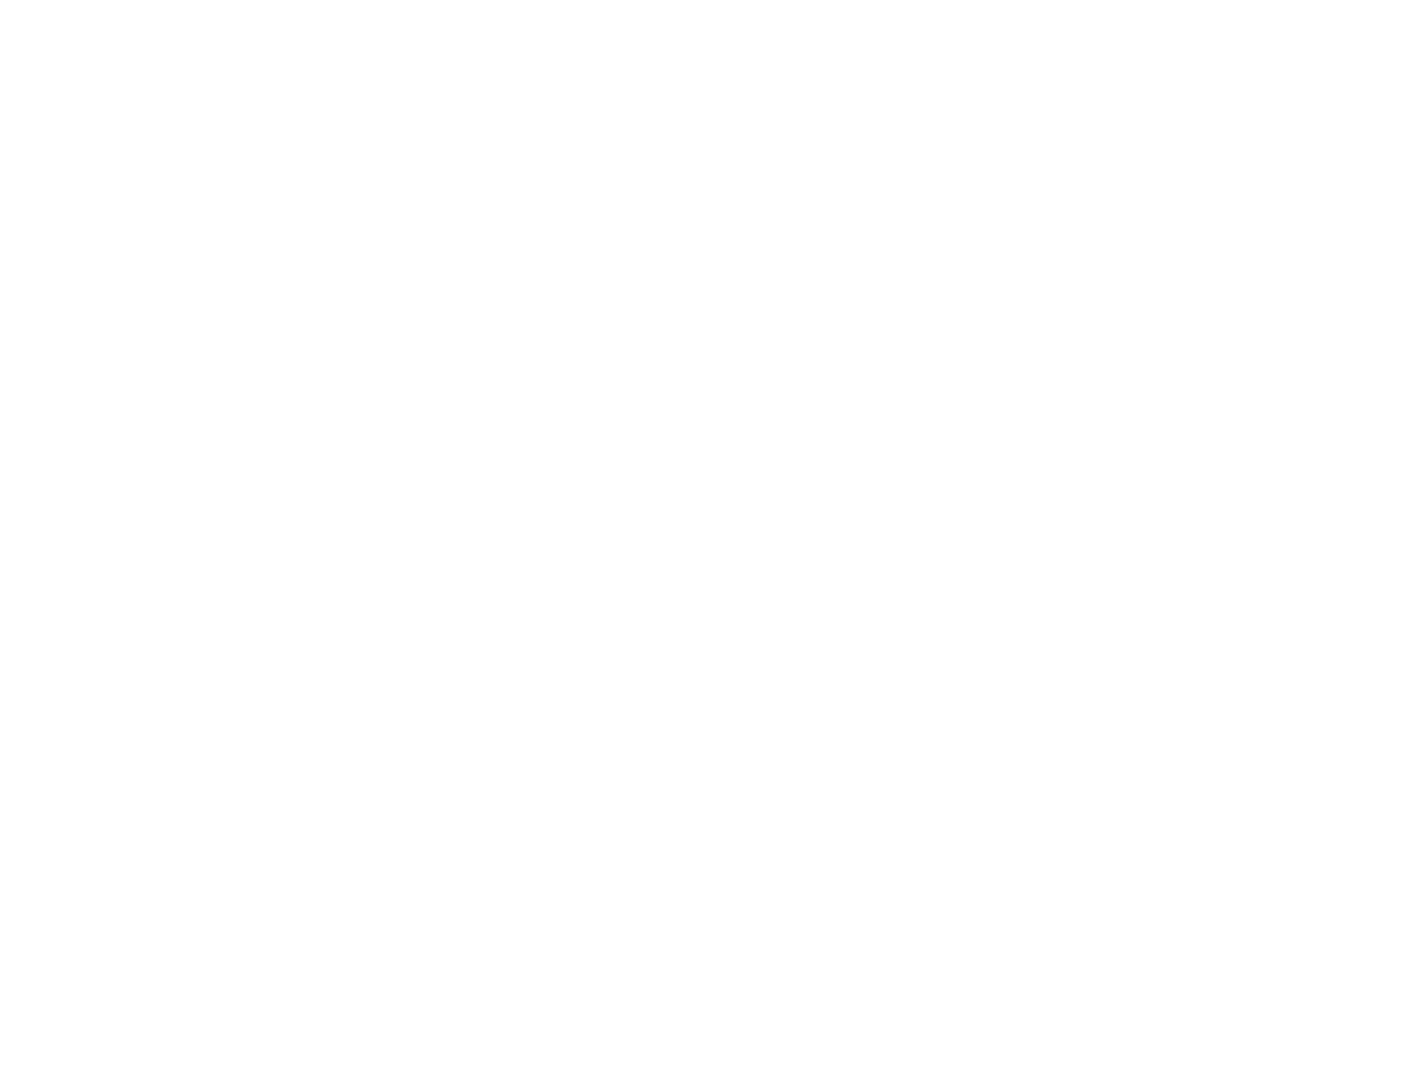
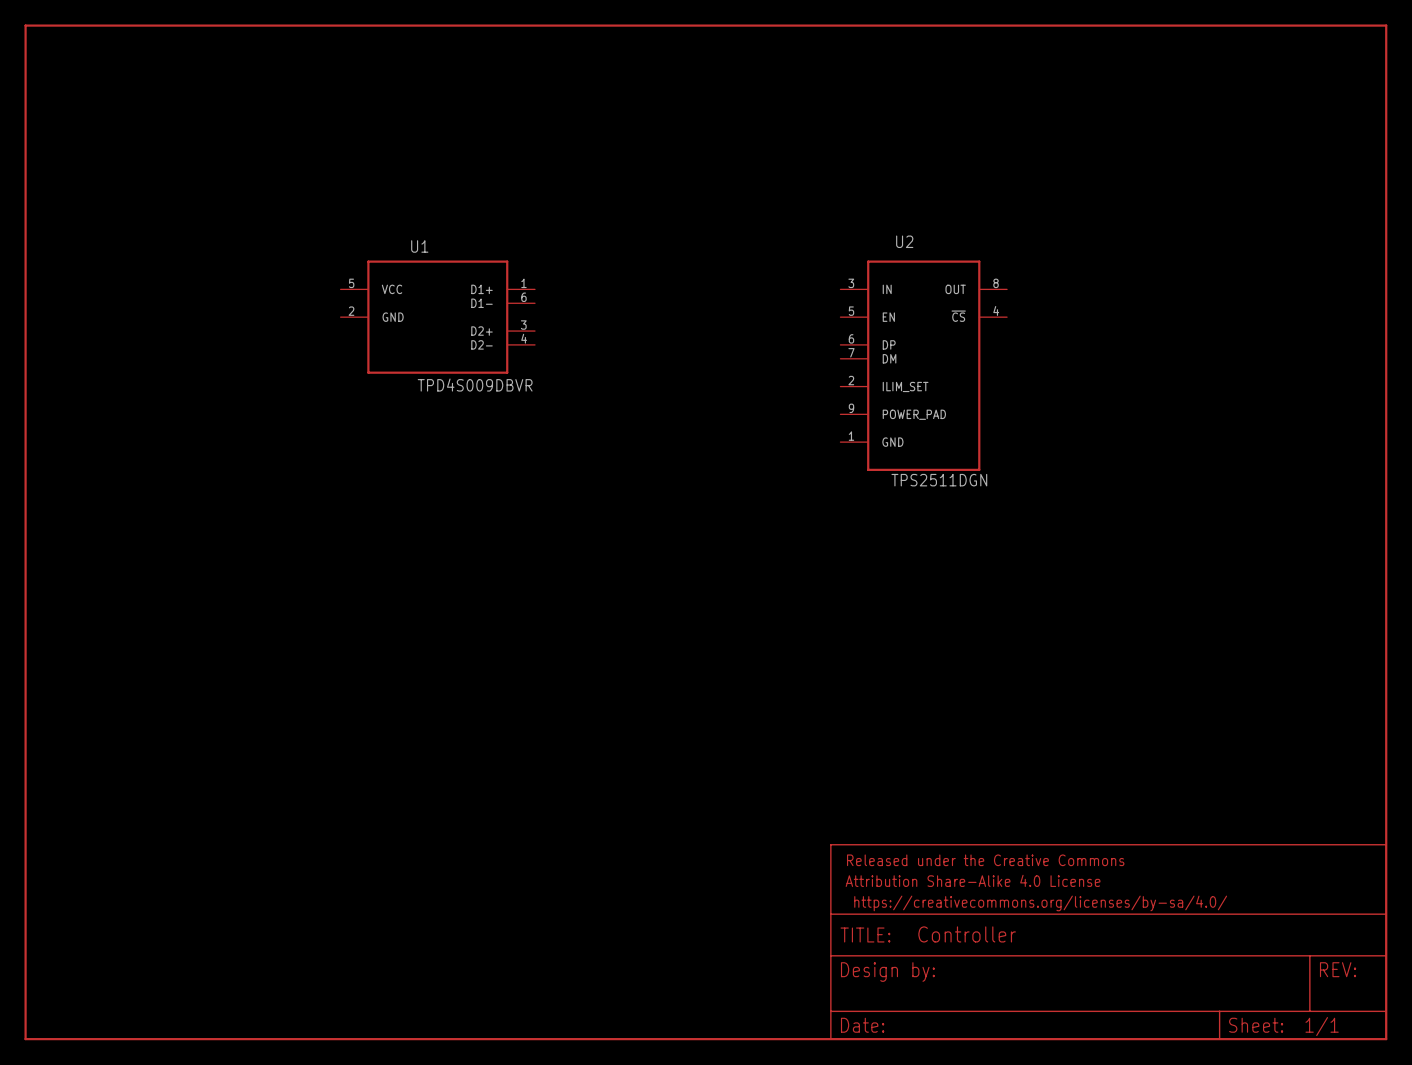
U1: none -> TPD4S009DBVR (437, 317)
U2: none -> TPS2511DGN (923, 365)
part: none -> (705, 532)
part: none -> (1108, 941)

